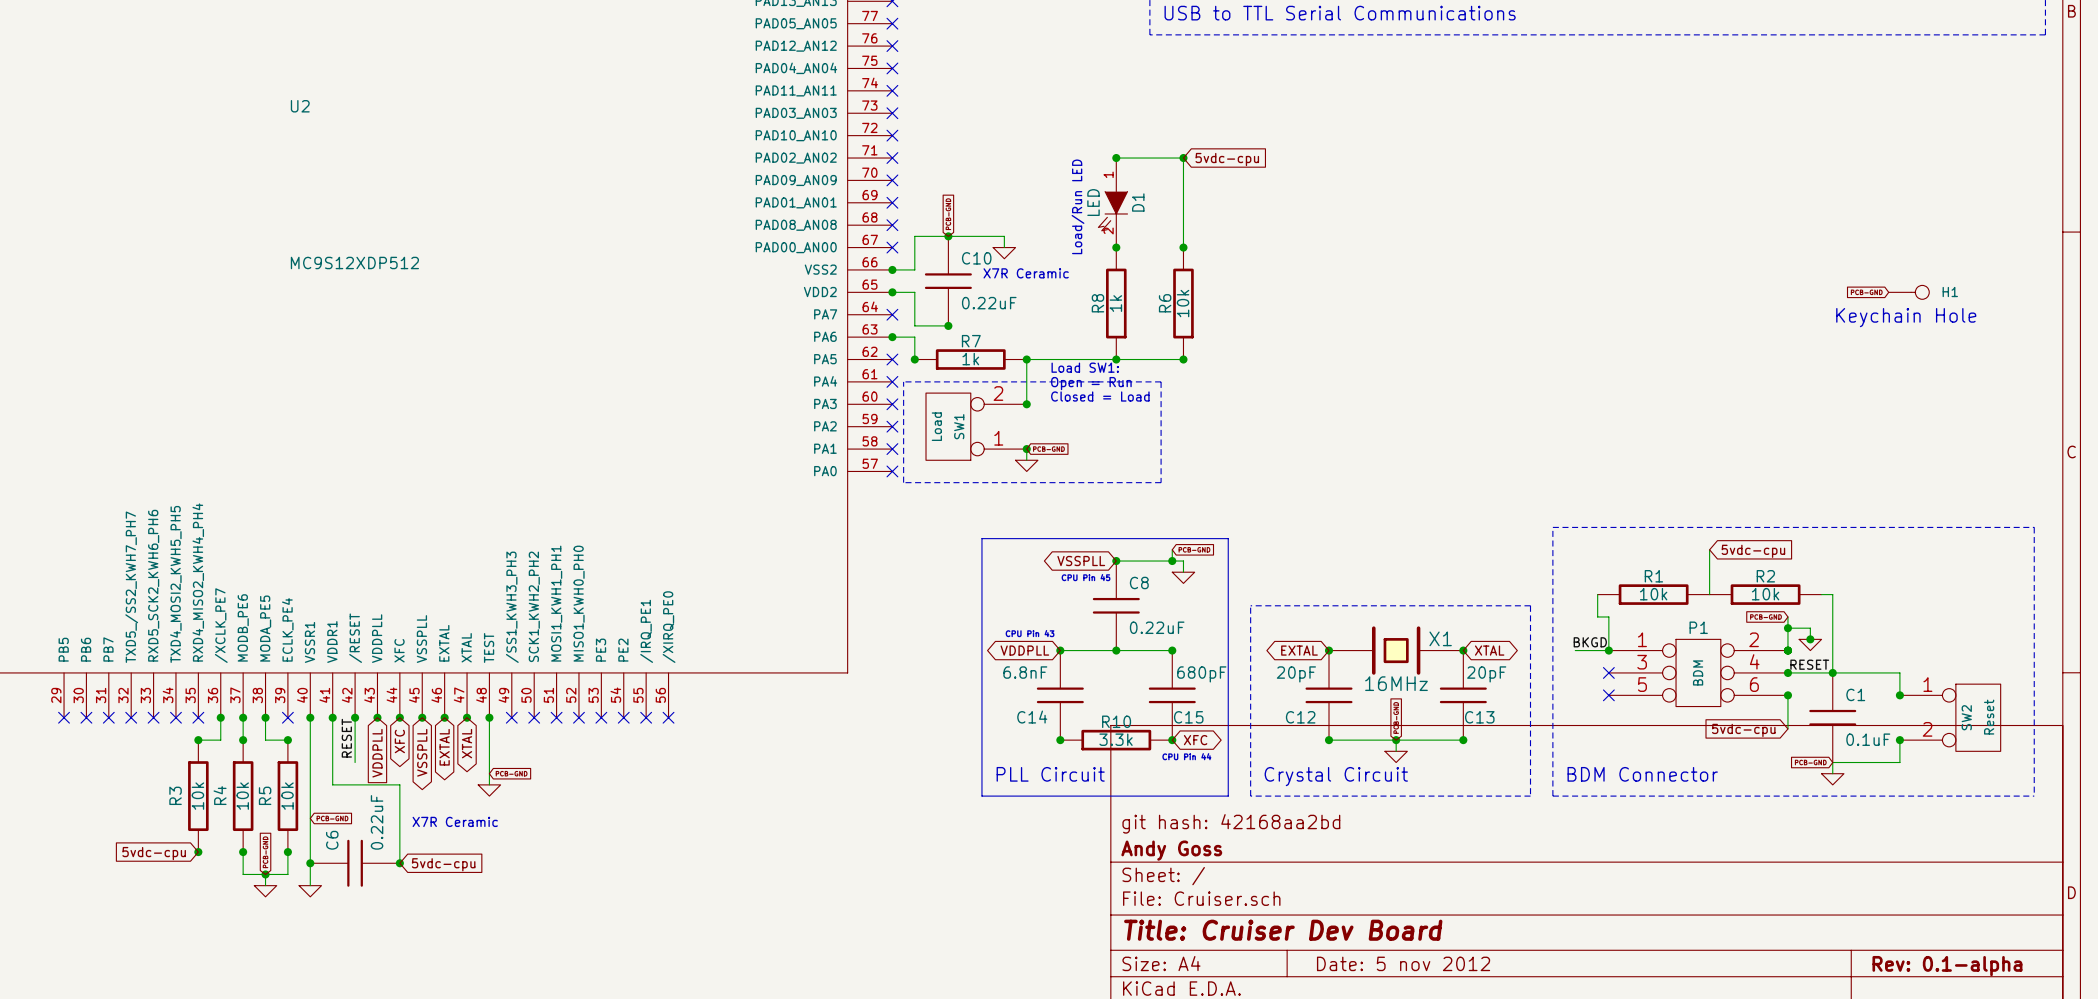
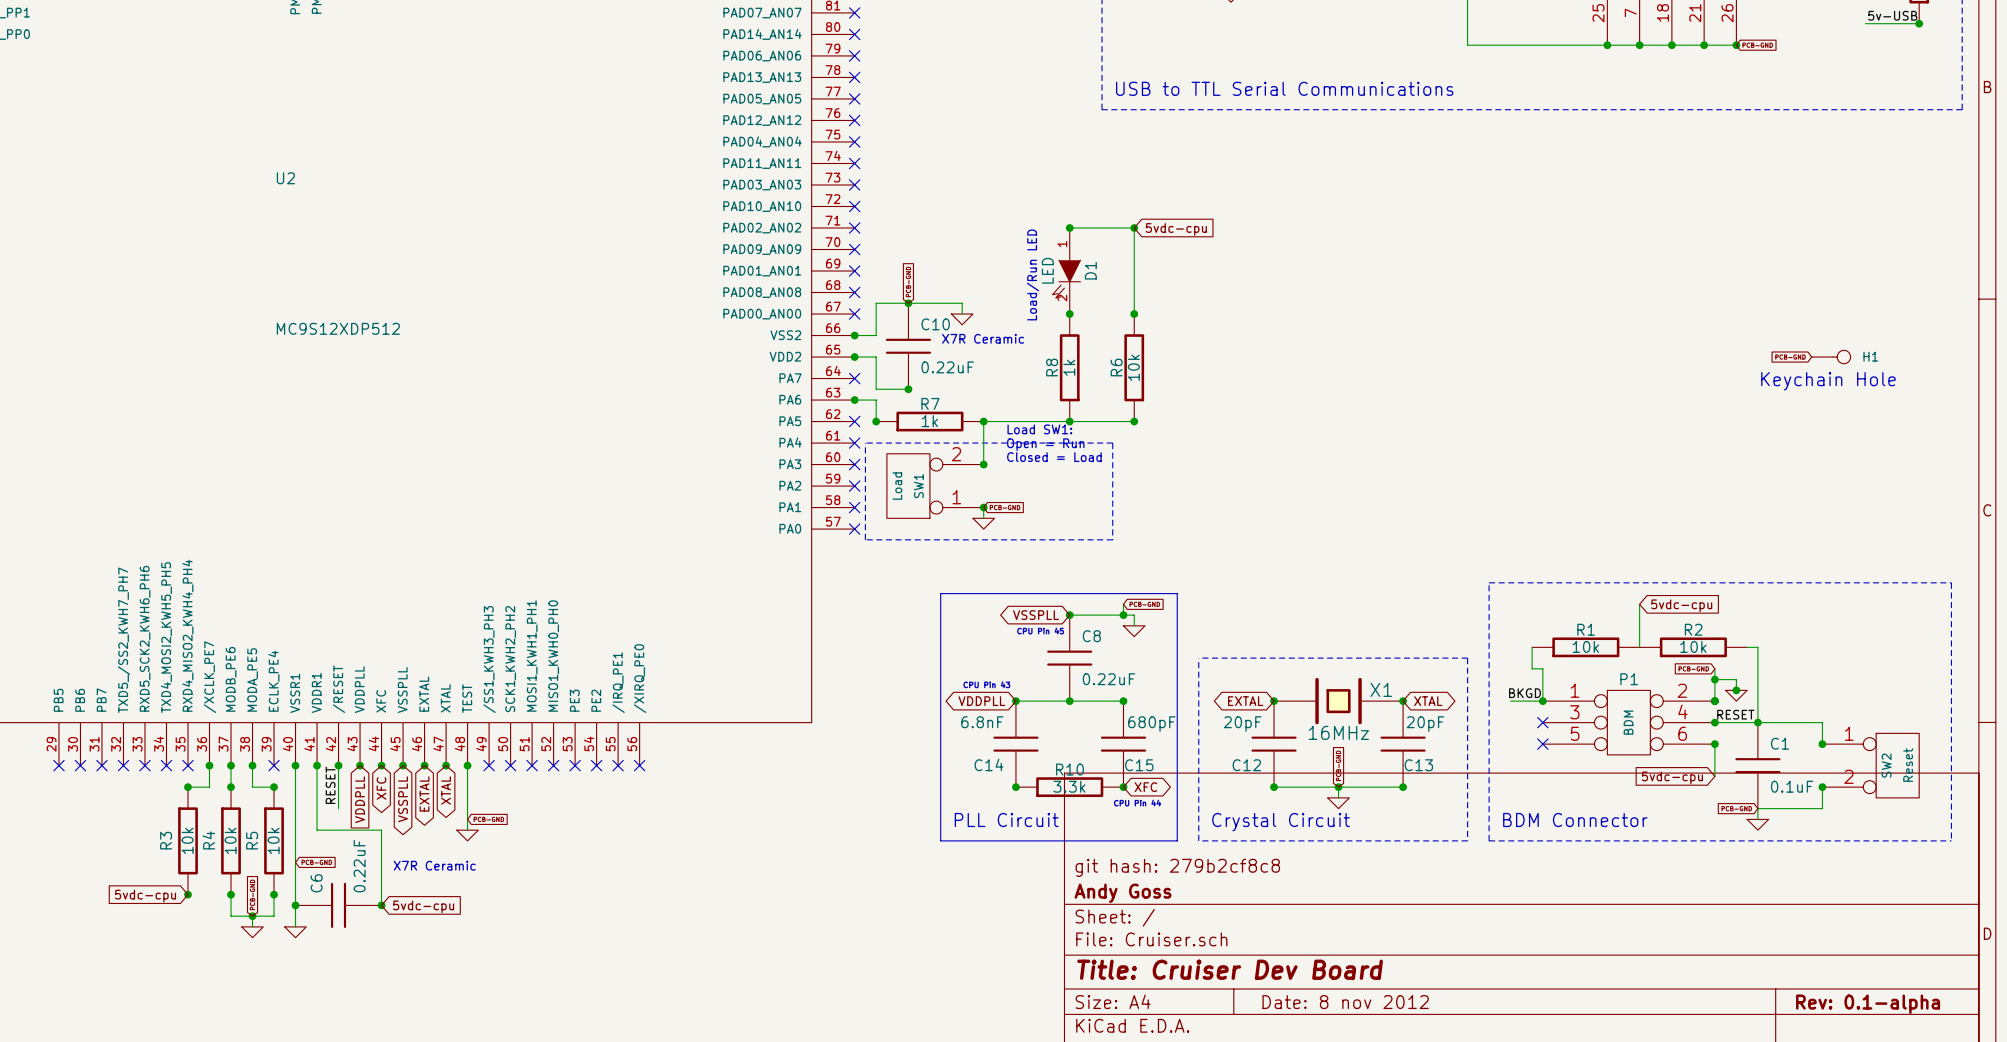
title block: git hash: 42168aa2bd (1231, 823) -> git hash: 279b2cf8c8 (1177, 867)
title block: Date: 5 nov 2012 (1403, 963) -> Date: 8 nov 2012 (1345, 1002)

